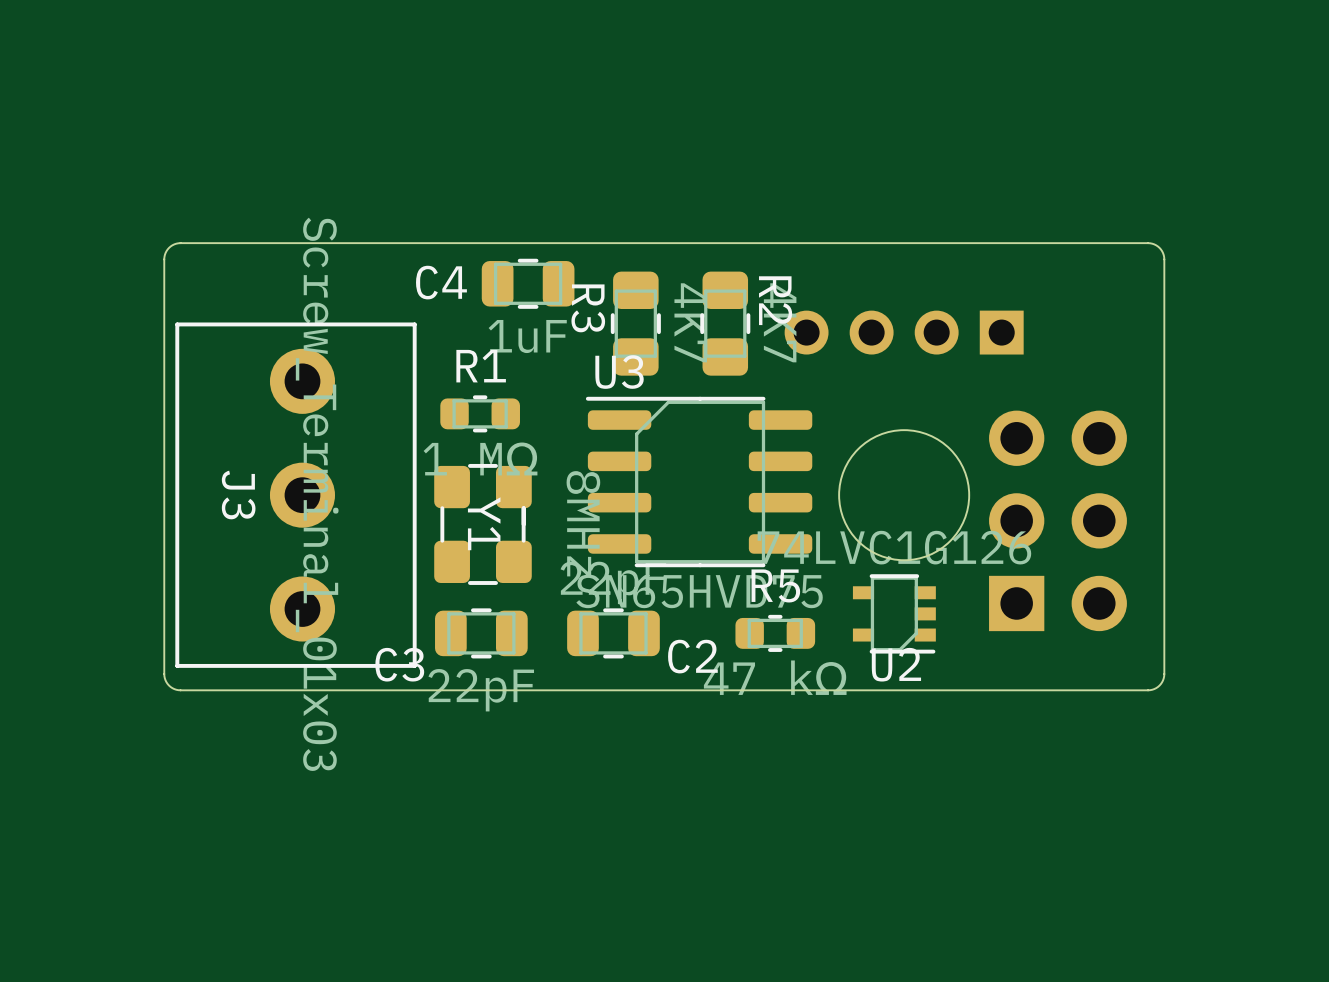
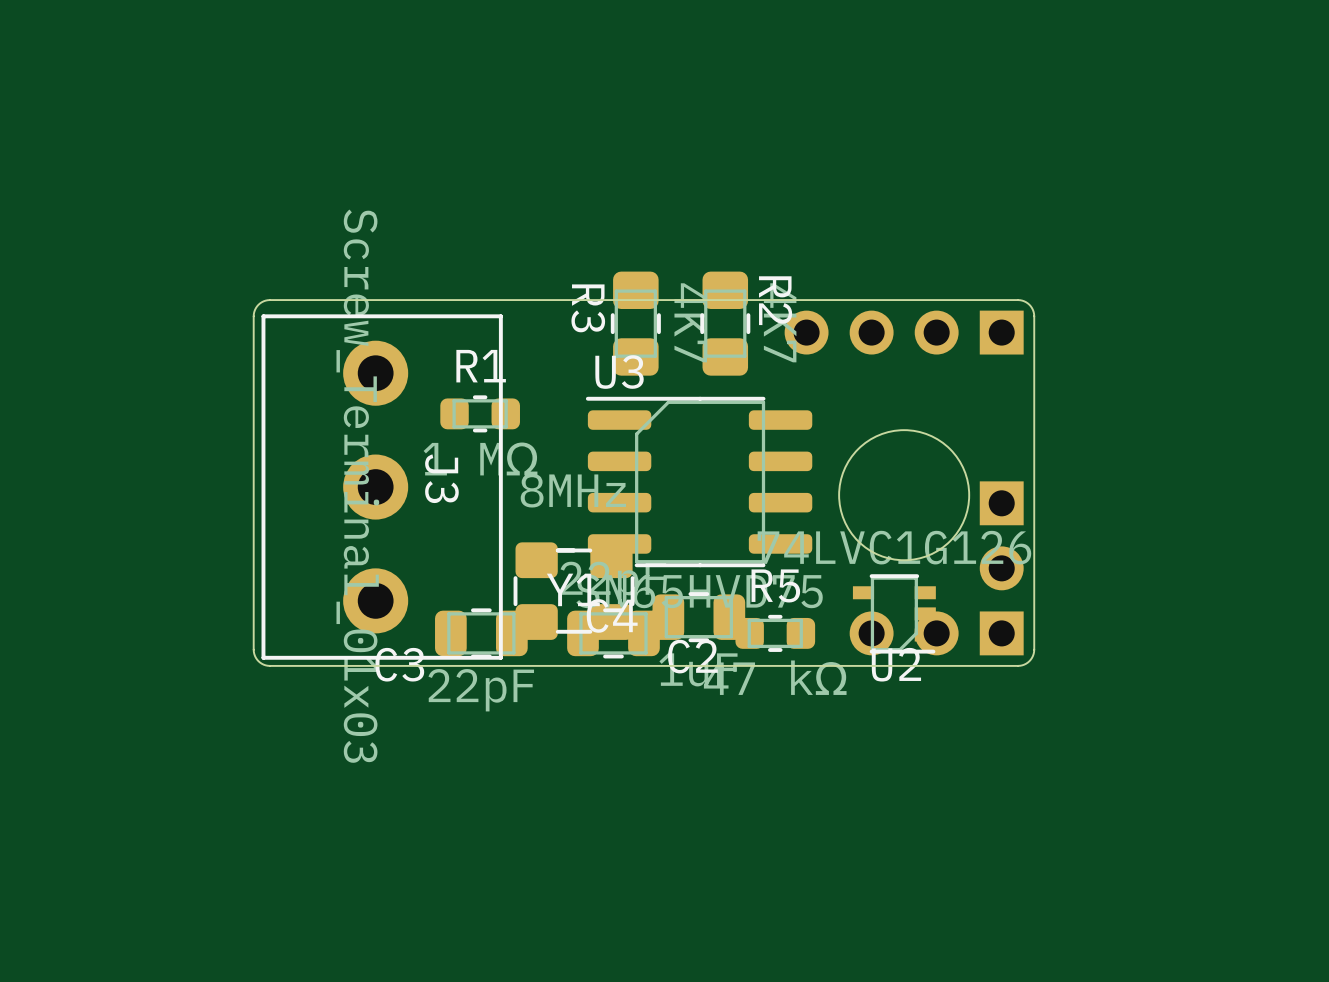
board edge: (1148, 243) (174, 244) (167, 249) (164, 259) (165, 680) (170, 686) (180, 690) (1154, 689) (1160, 683) (1164, 674) (1164, 259) (1159, 247) (1148, 243) -> (1017, 300) (1029, 304) (1034, 316) (1034, 649) (1030, 659) (1024, 664) (269, 665) (260, 662) (254, 655) (253, 316) (257, 306) (263, 301) (1017, 300)
C4 position: (528, 283) -> (698, 617)
J3 rotation: 0° (295, 495) -> 180° (382, 487)
part: (1057, 520) -> none
Y1 rotation: 0° (482, 524) -> 90° counterclockwise (574, 591)
Y1 position: (482, 524) -> (574, 591)
part: none -> (1001, 535)
part: none -> (936, 633)

